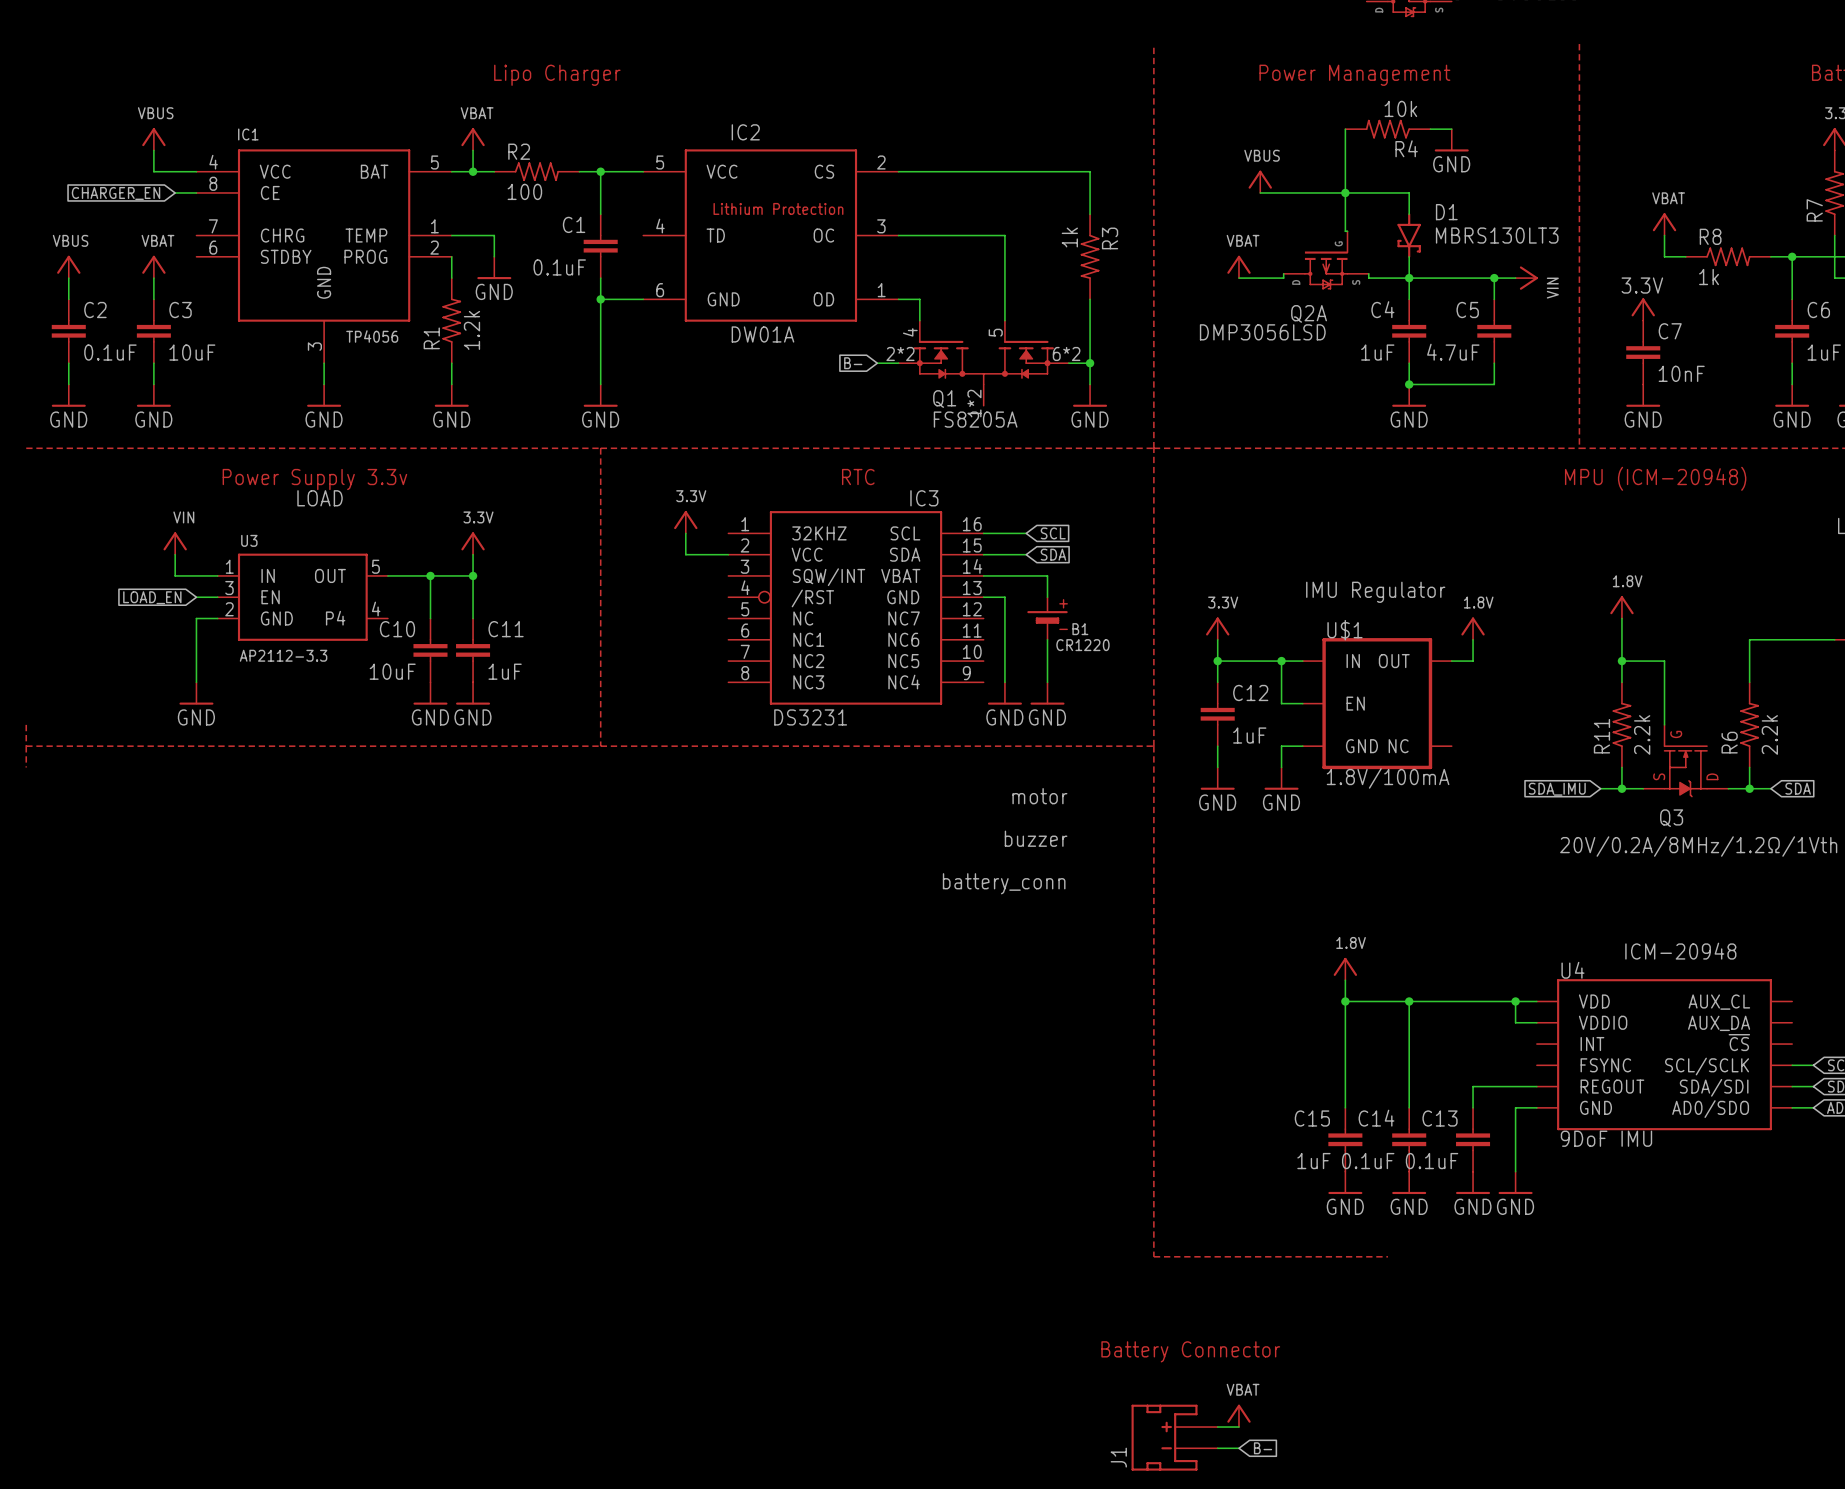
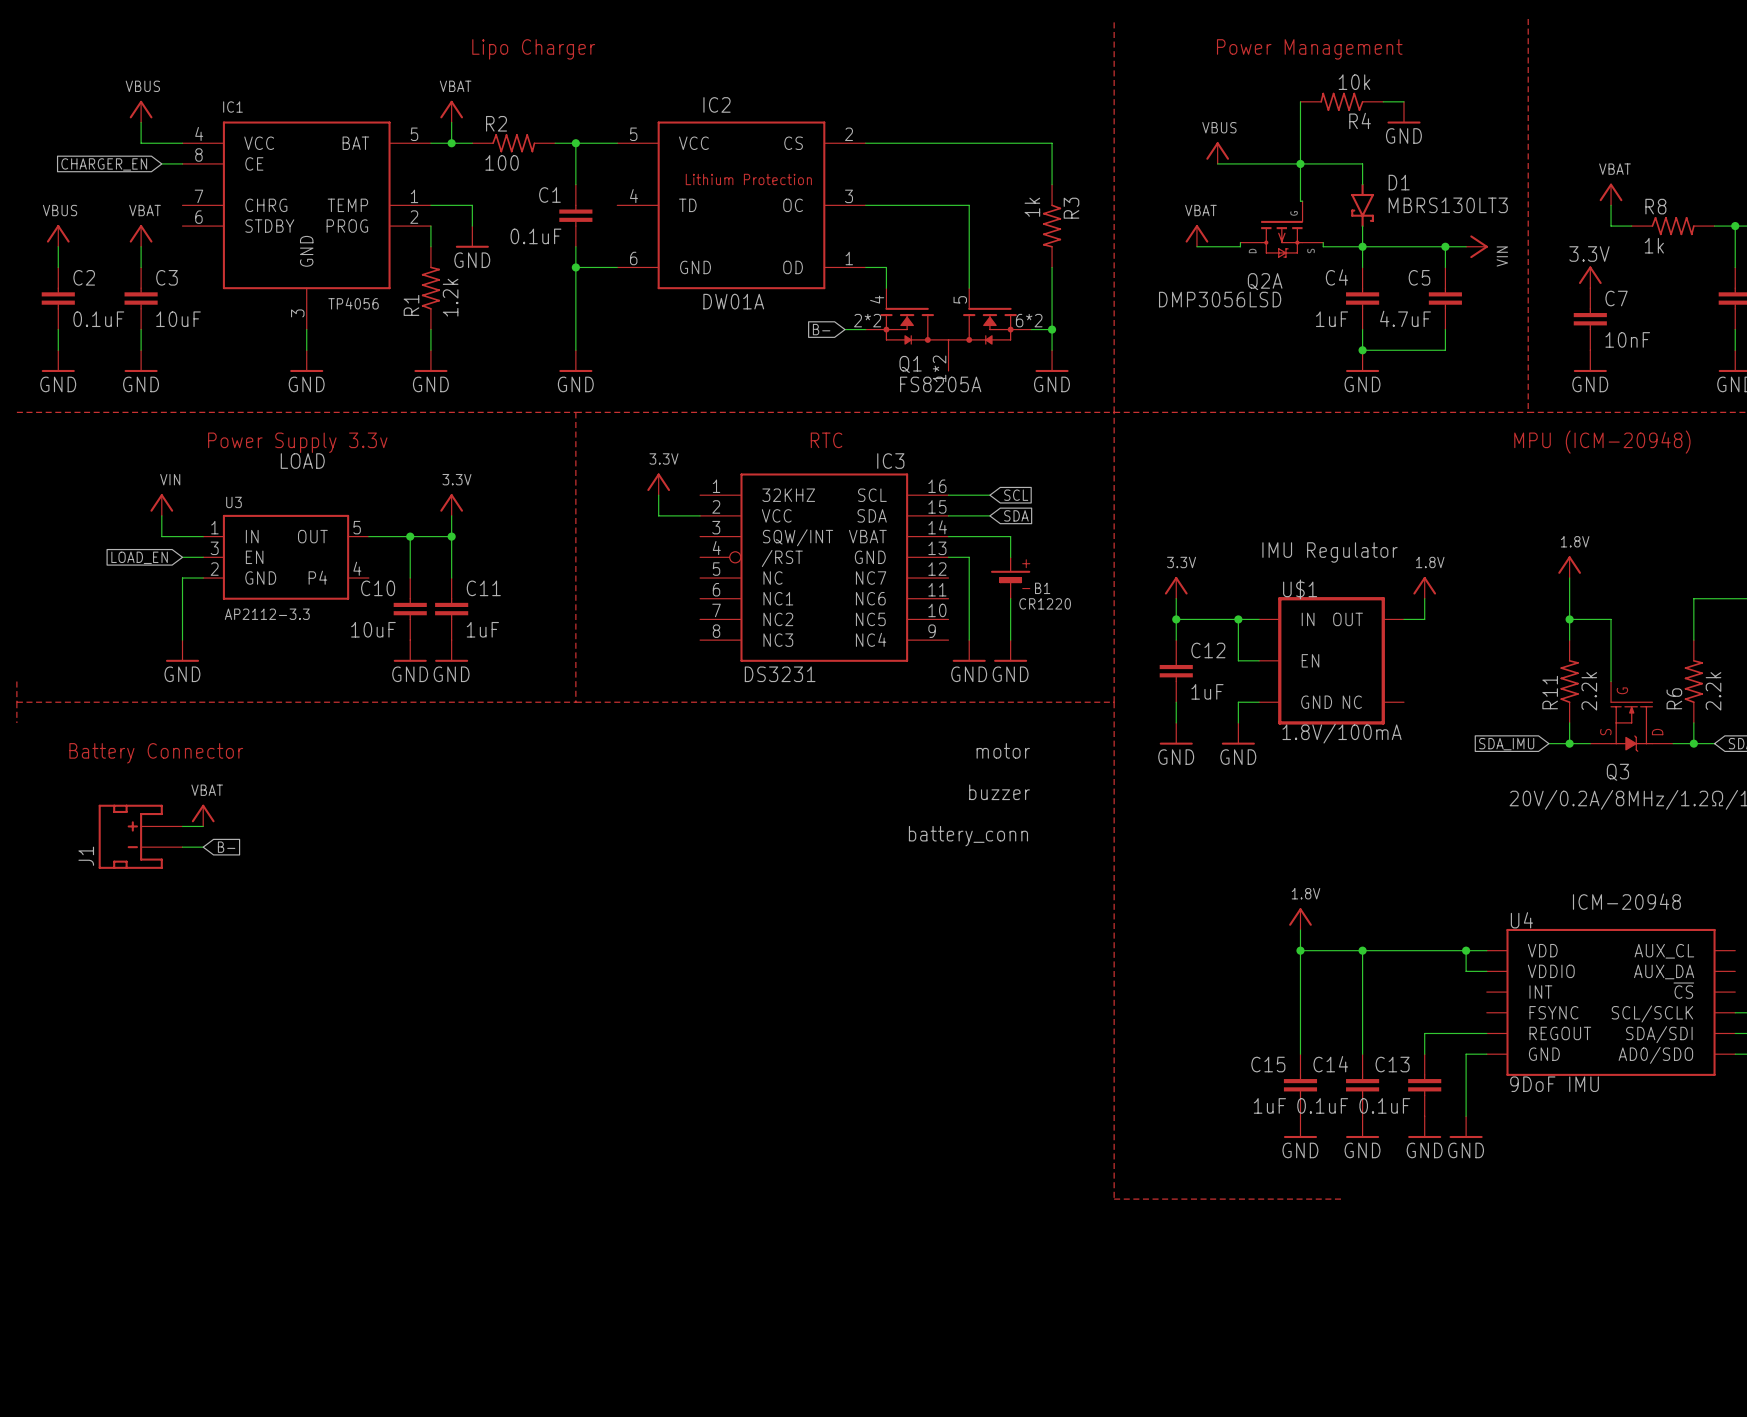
text: none -> Battery Connector (156, 753)
power symbol: none -> VBAT (203, 815)
wire: none -> (182, 826) (203, 826)
wire: none -> (182, 847) (203, 847)
global label: none -> B- (226, 847)
text: Battery Connector (1190, 1351) -> none
power symbol: VBAT (1238, 1415) -> none
wire: (1217, 1427) (1238, 1427) -> none
J1 position: (1174, 1437) -> (140, 836)
wire: (1217, 1448) (1238, 1448) -> none
global label: B- (1263, 1448) -> none

